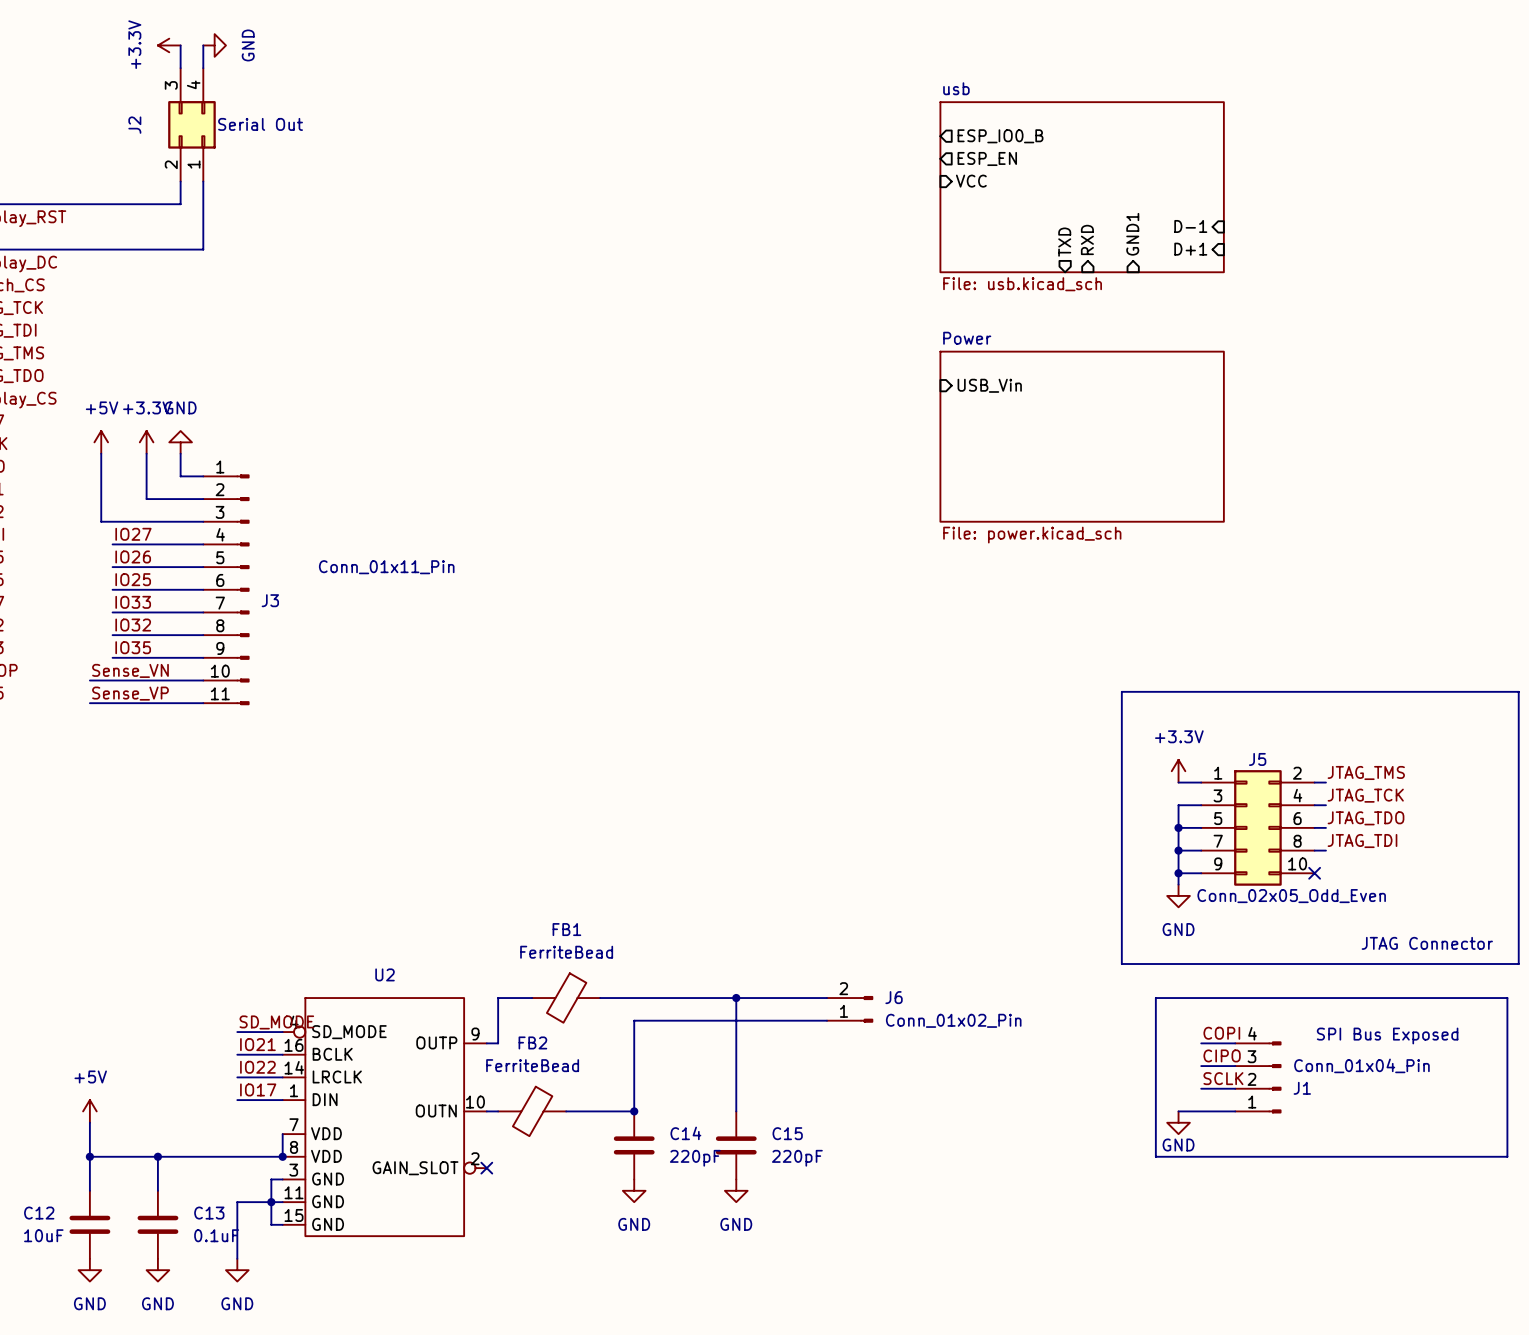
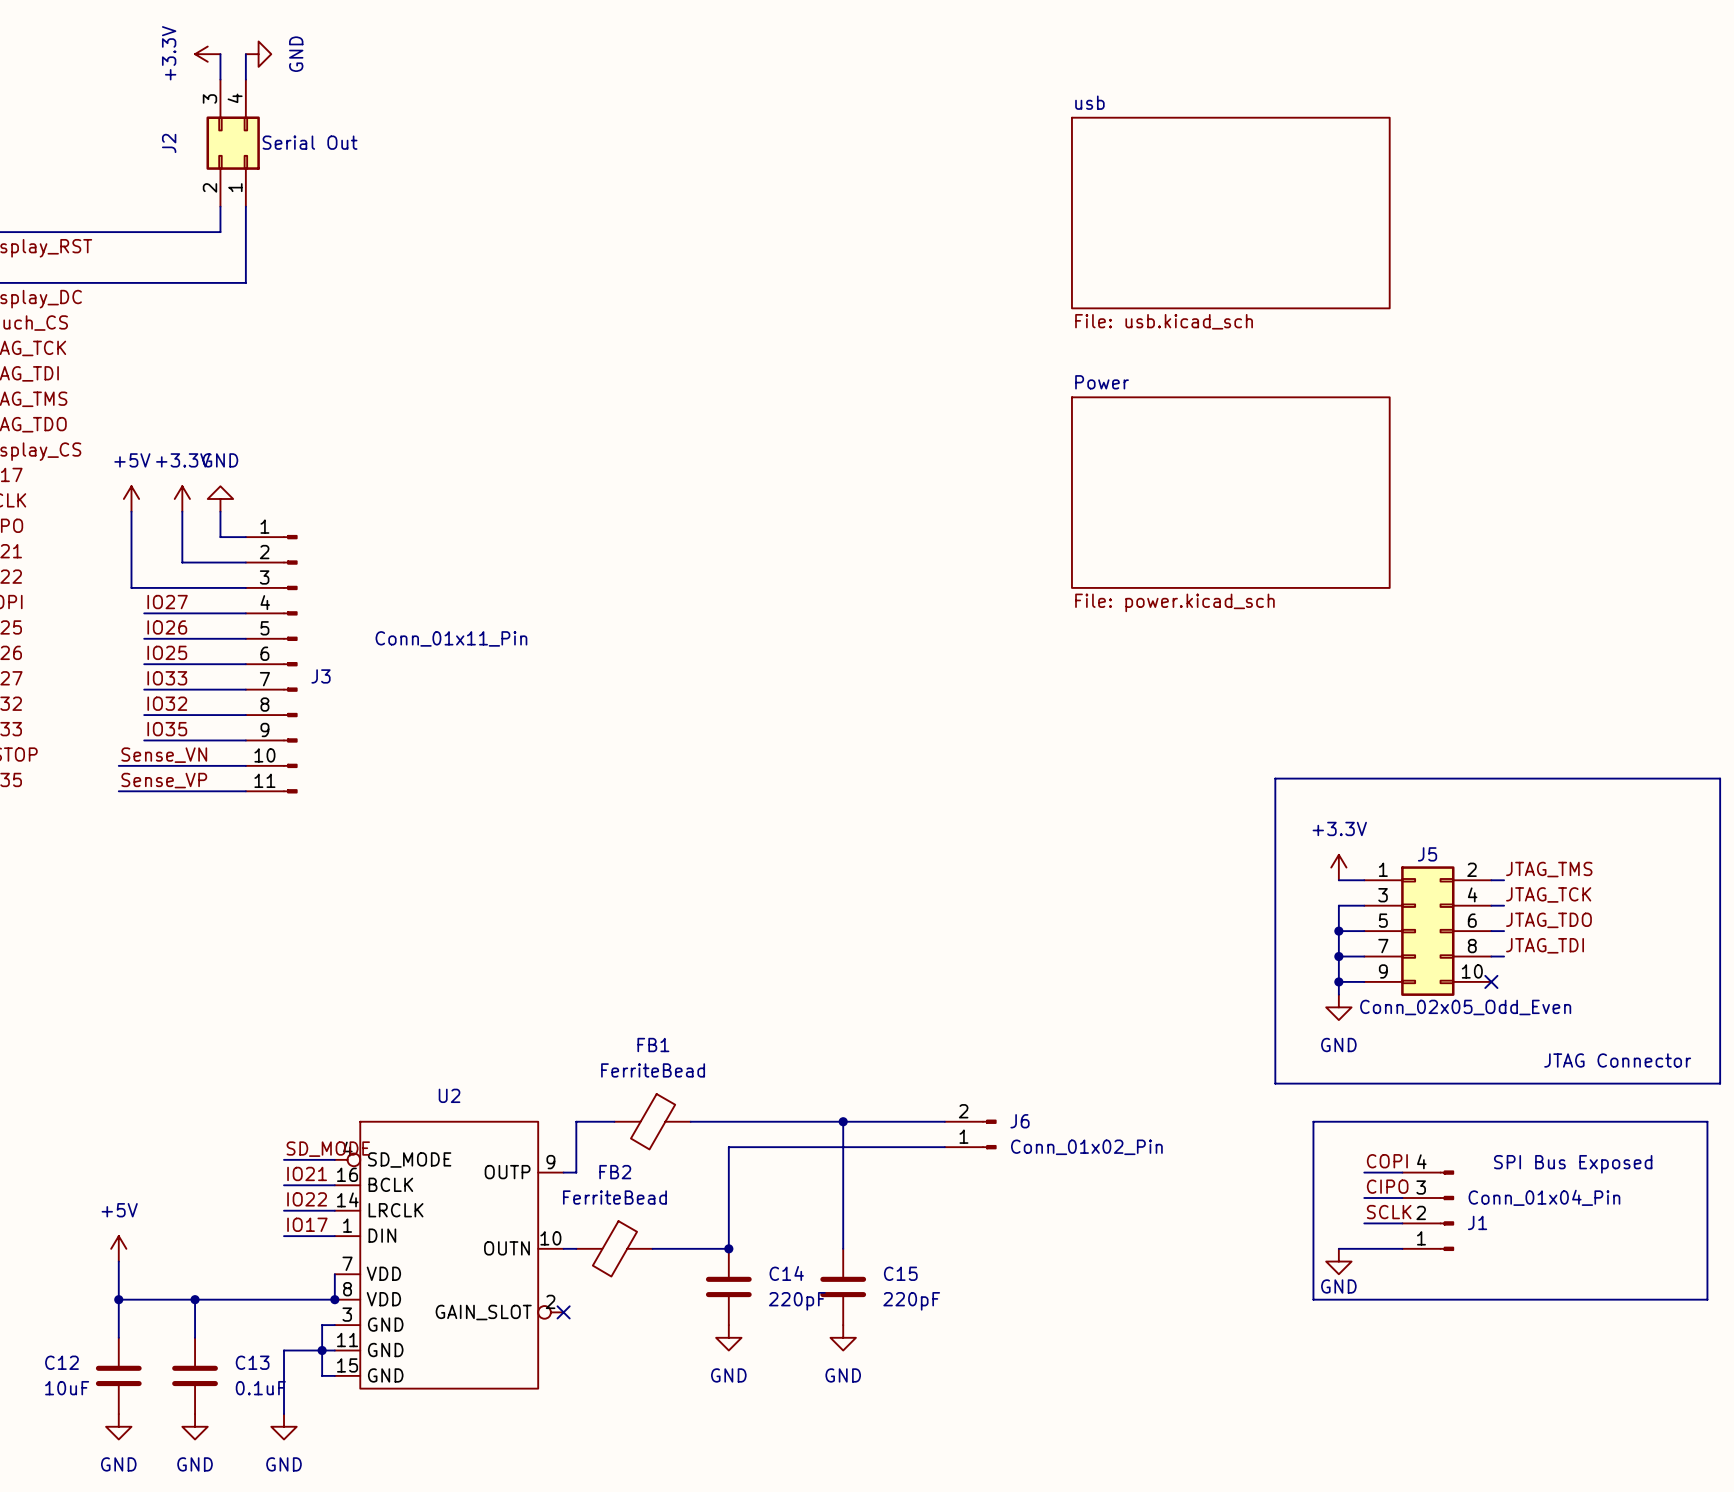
sheet pin: ESP_IO0_B (1000, 136) -> none
sheet pin: ESP_EN (987, 158) -> none
sheet pin: VCC (971, 181) -> none
sheet pin: D-1 (1190, 226) -> none
sheet pin: GND1 (1132, 234) -> none
sheet pin: RXD (1087, 239) -> none
sheet pin: TXD (1064, 242) -> none
sheet pin: D+1 (1190, 249) -> none
sheet pin: USB_Vin (989, 385) -> none

